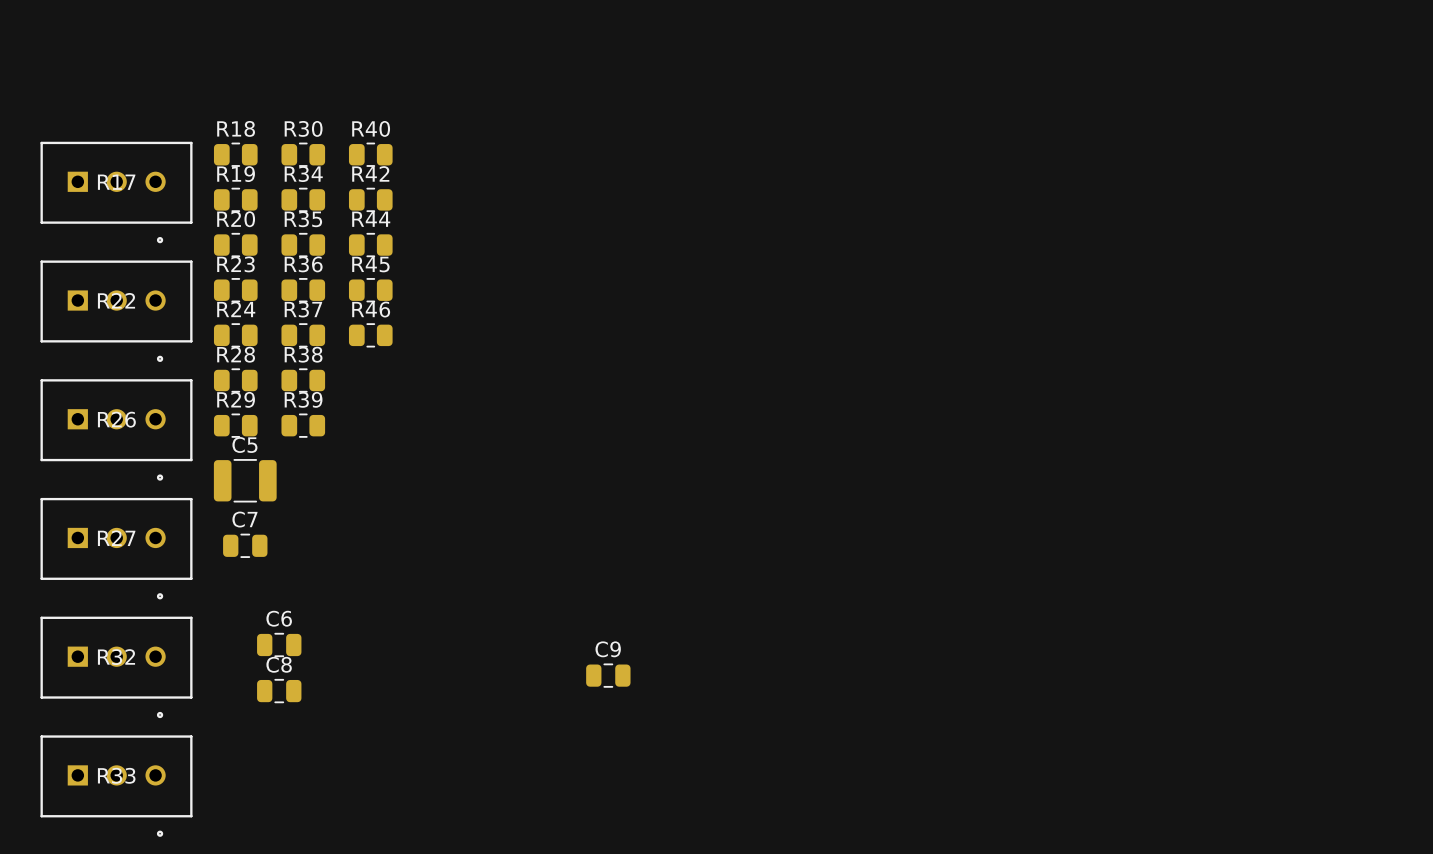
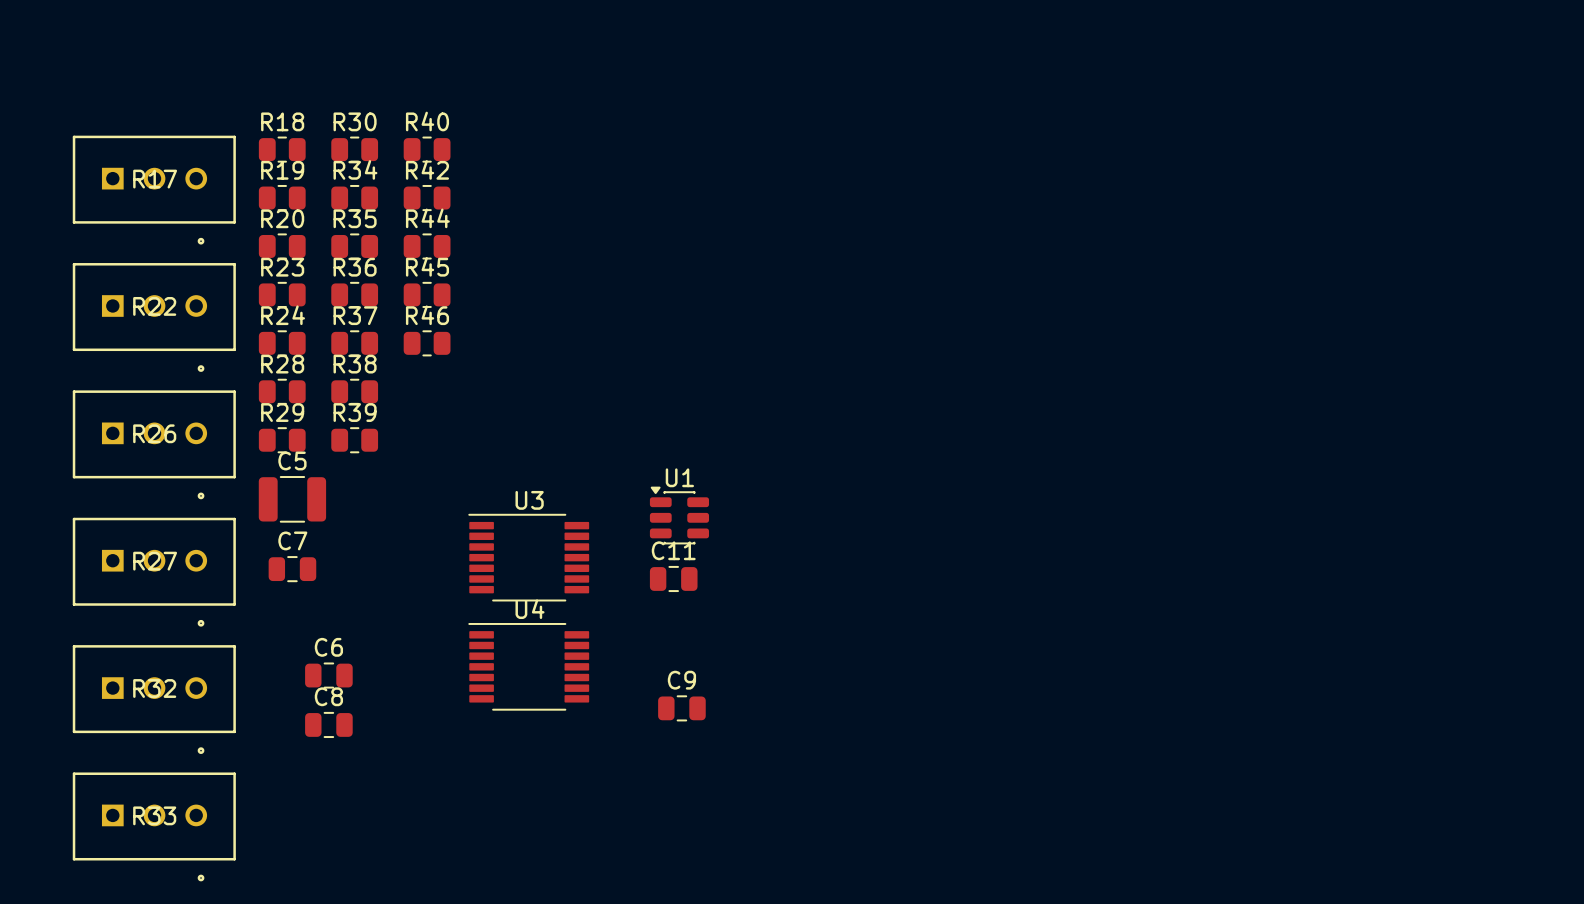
U1: none -> (679, 515)
U3: none -> (528, 557)
C11: none -> (673, 578)
U4: none -> (528, 666)

